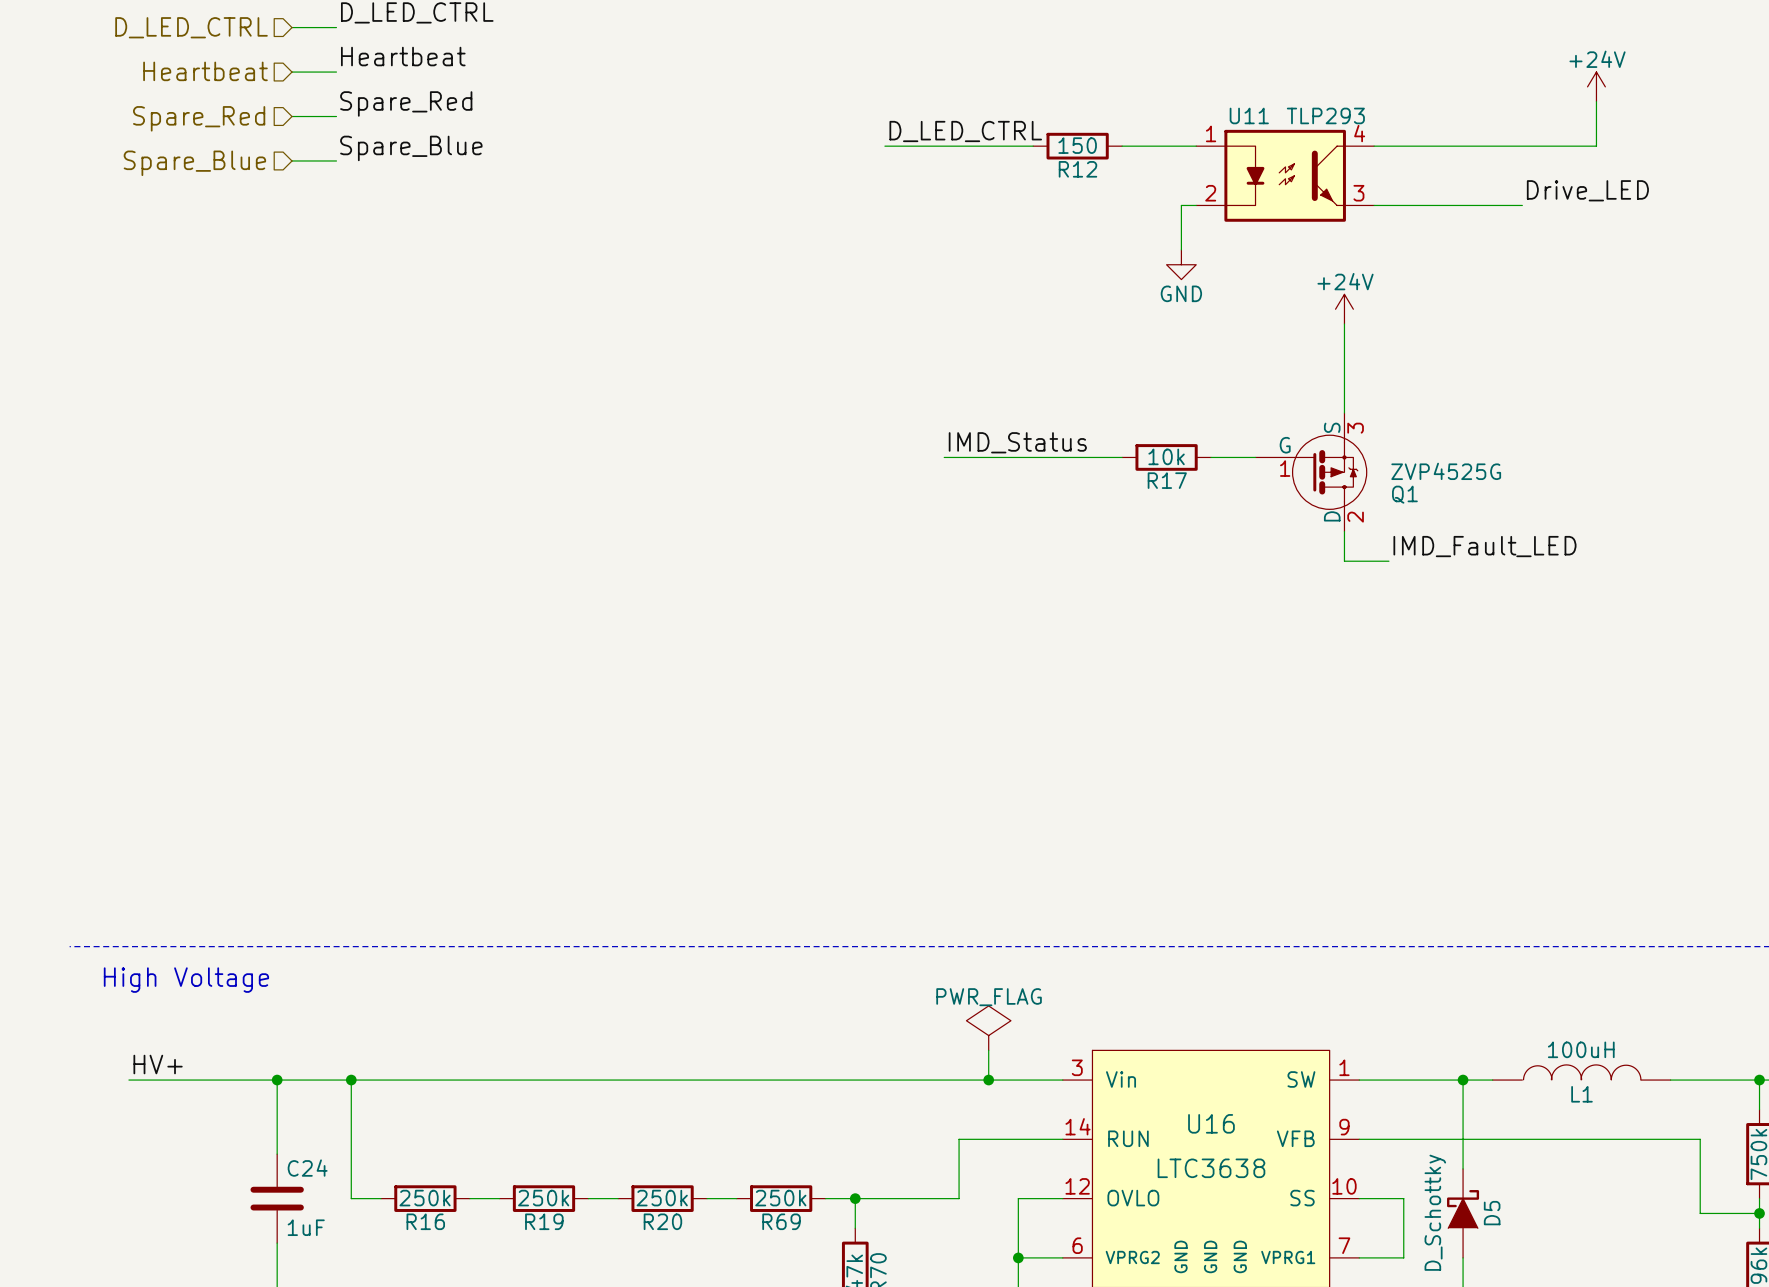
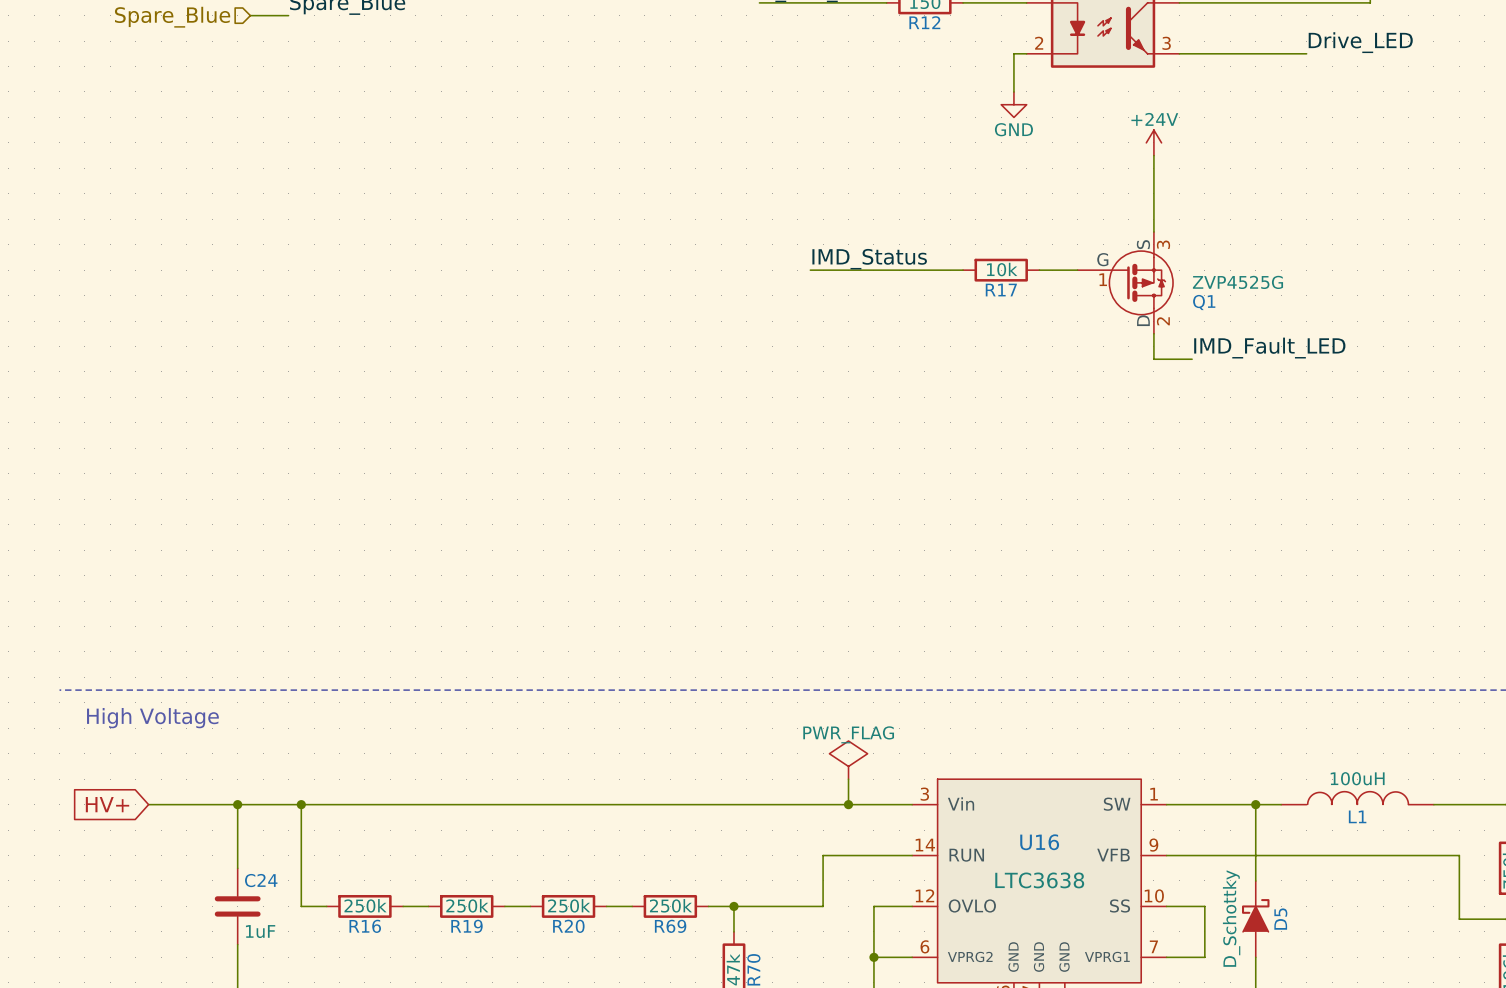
label: HV+ (158, 1064) -> none
global label: none -> HV+ (107, 804)
wire: (128, 1080) (173, 1080) -> none

